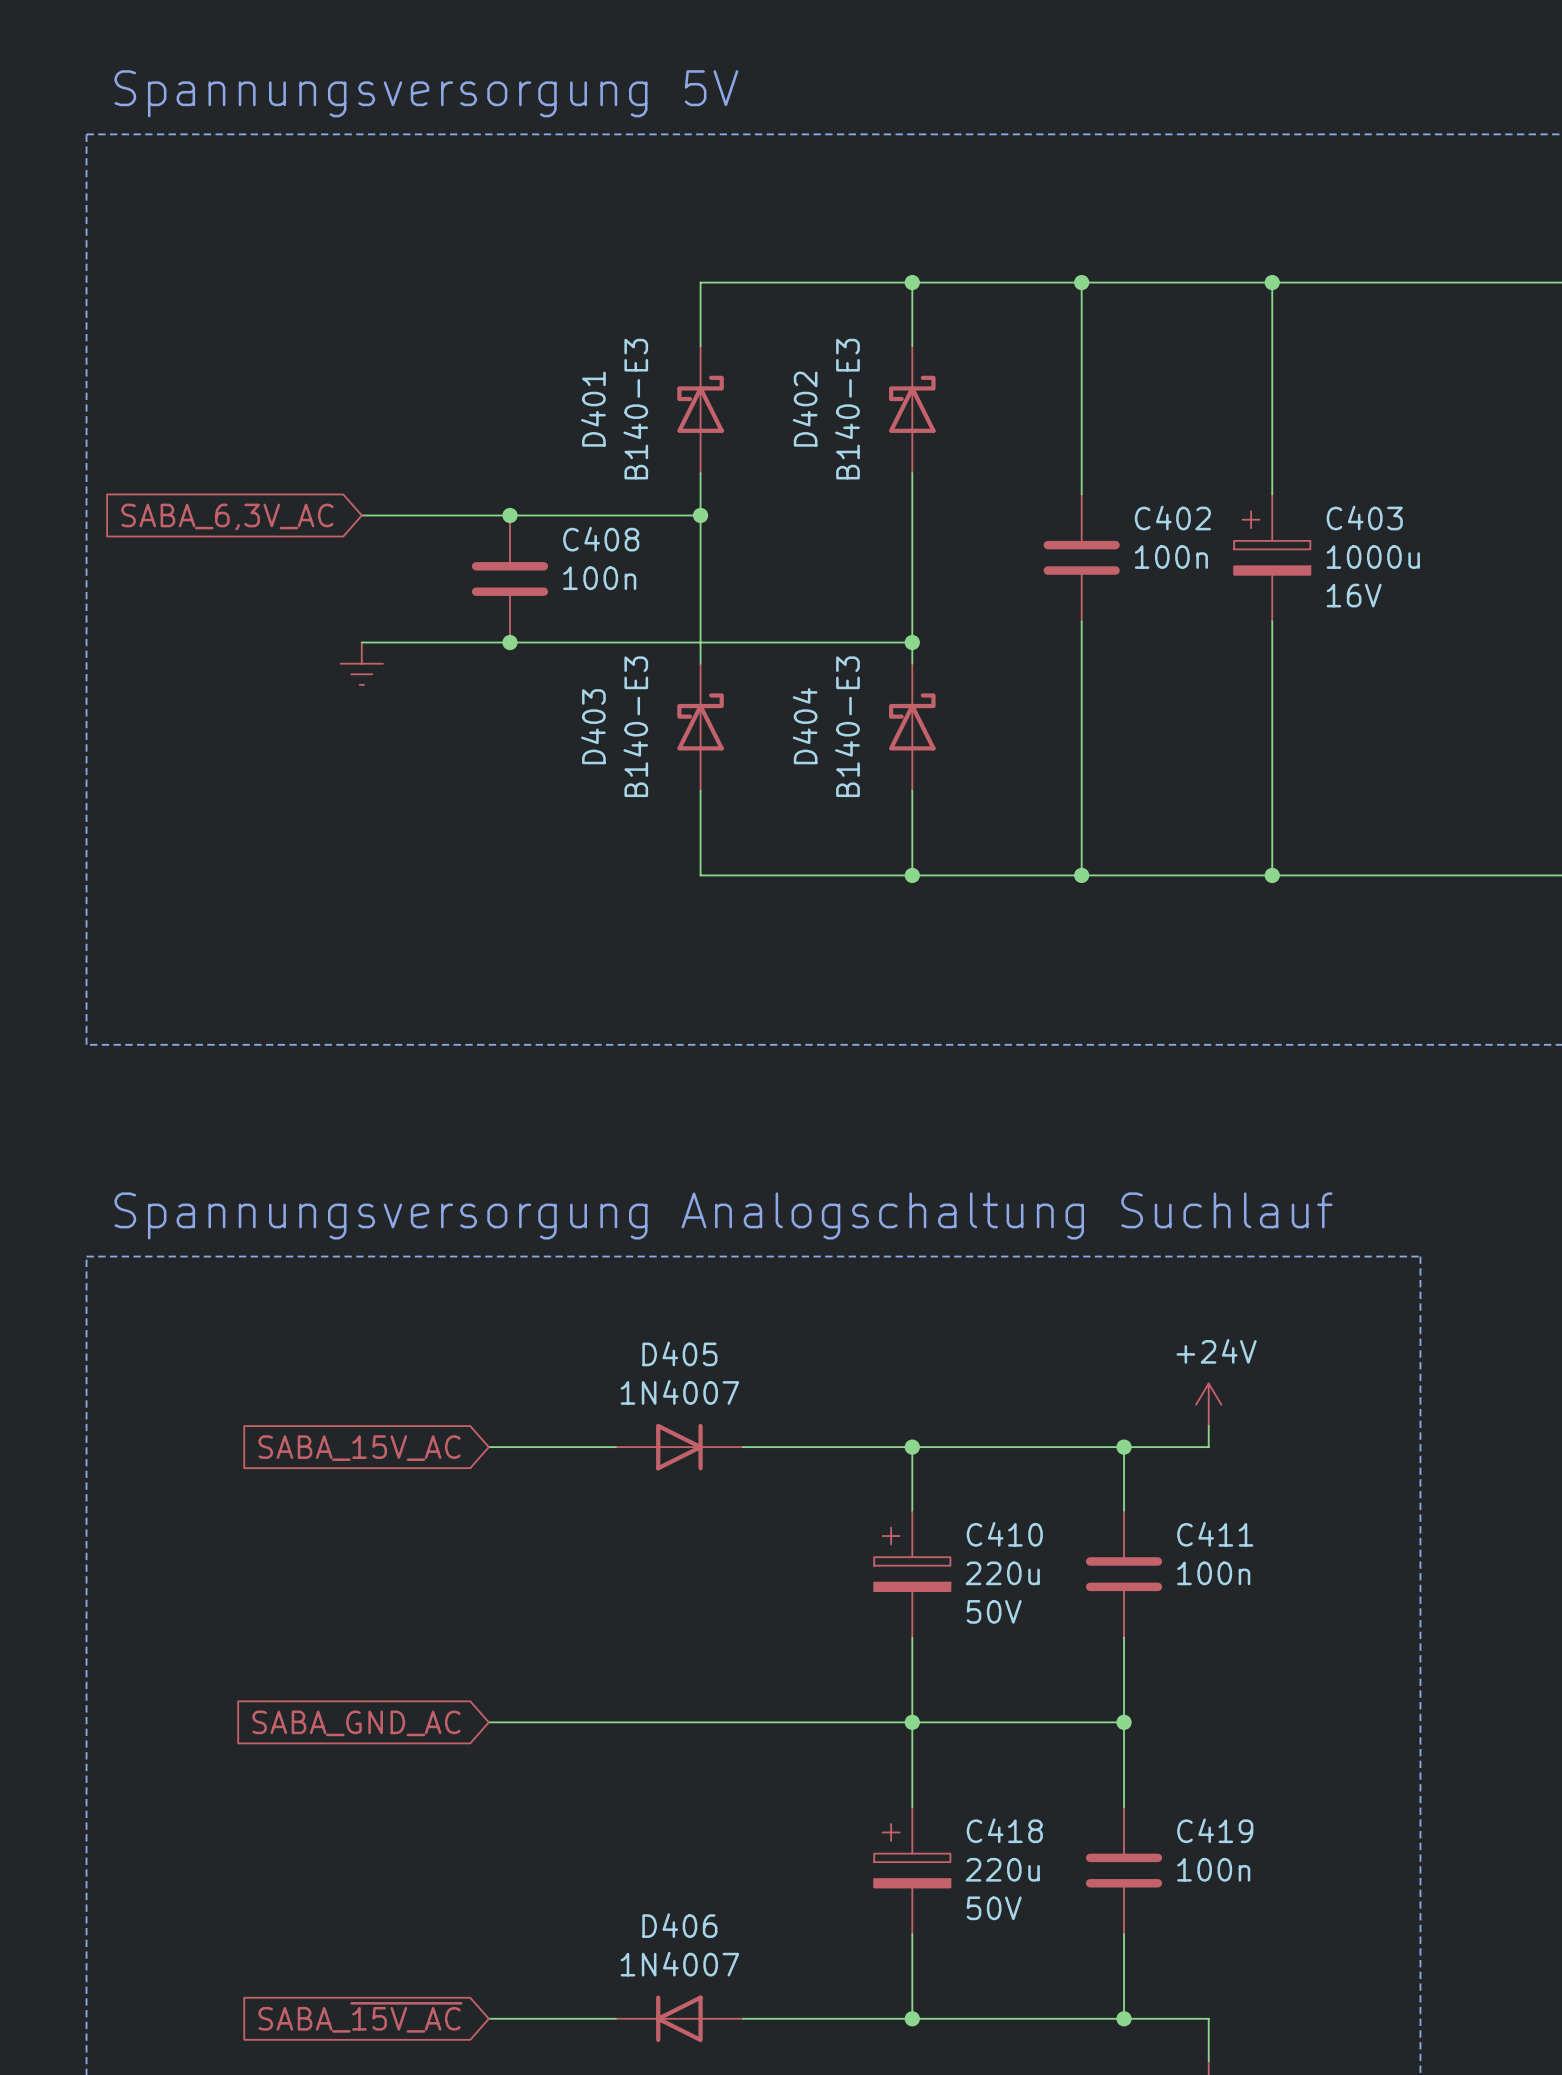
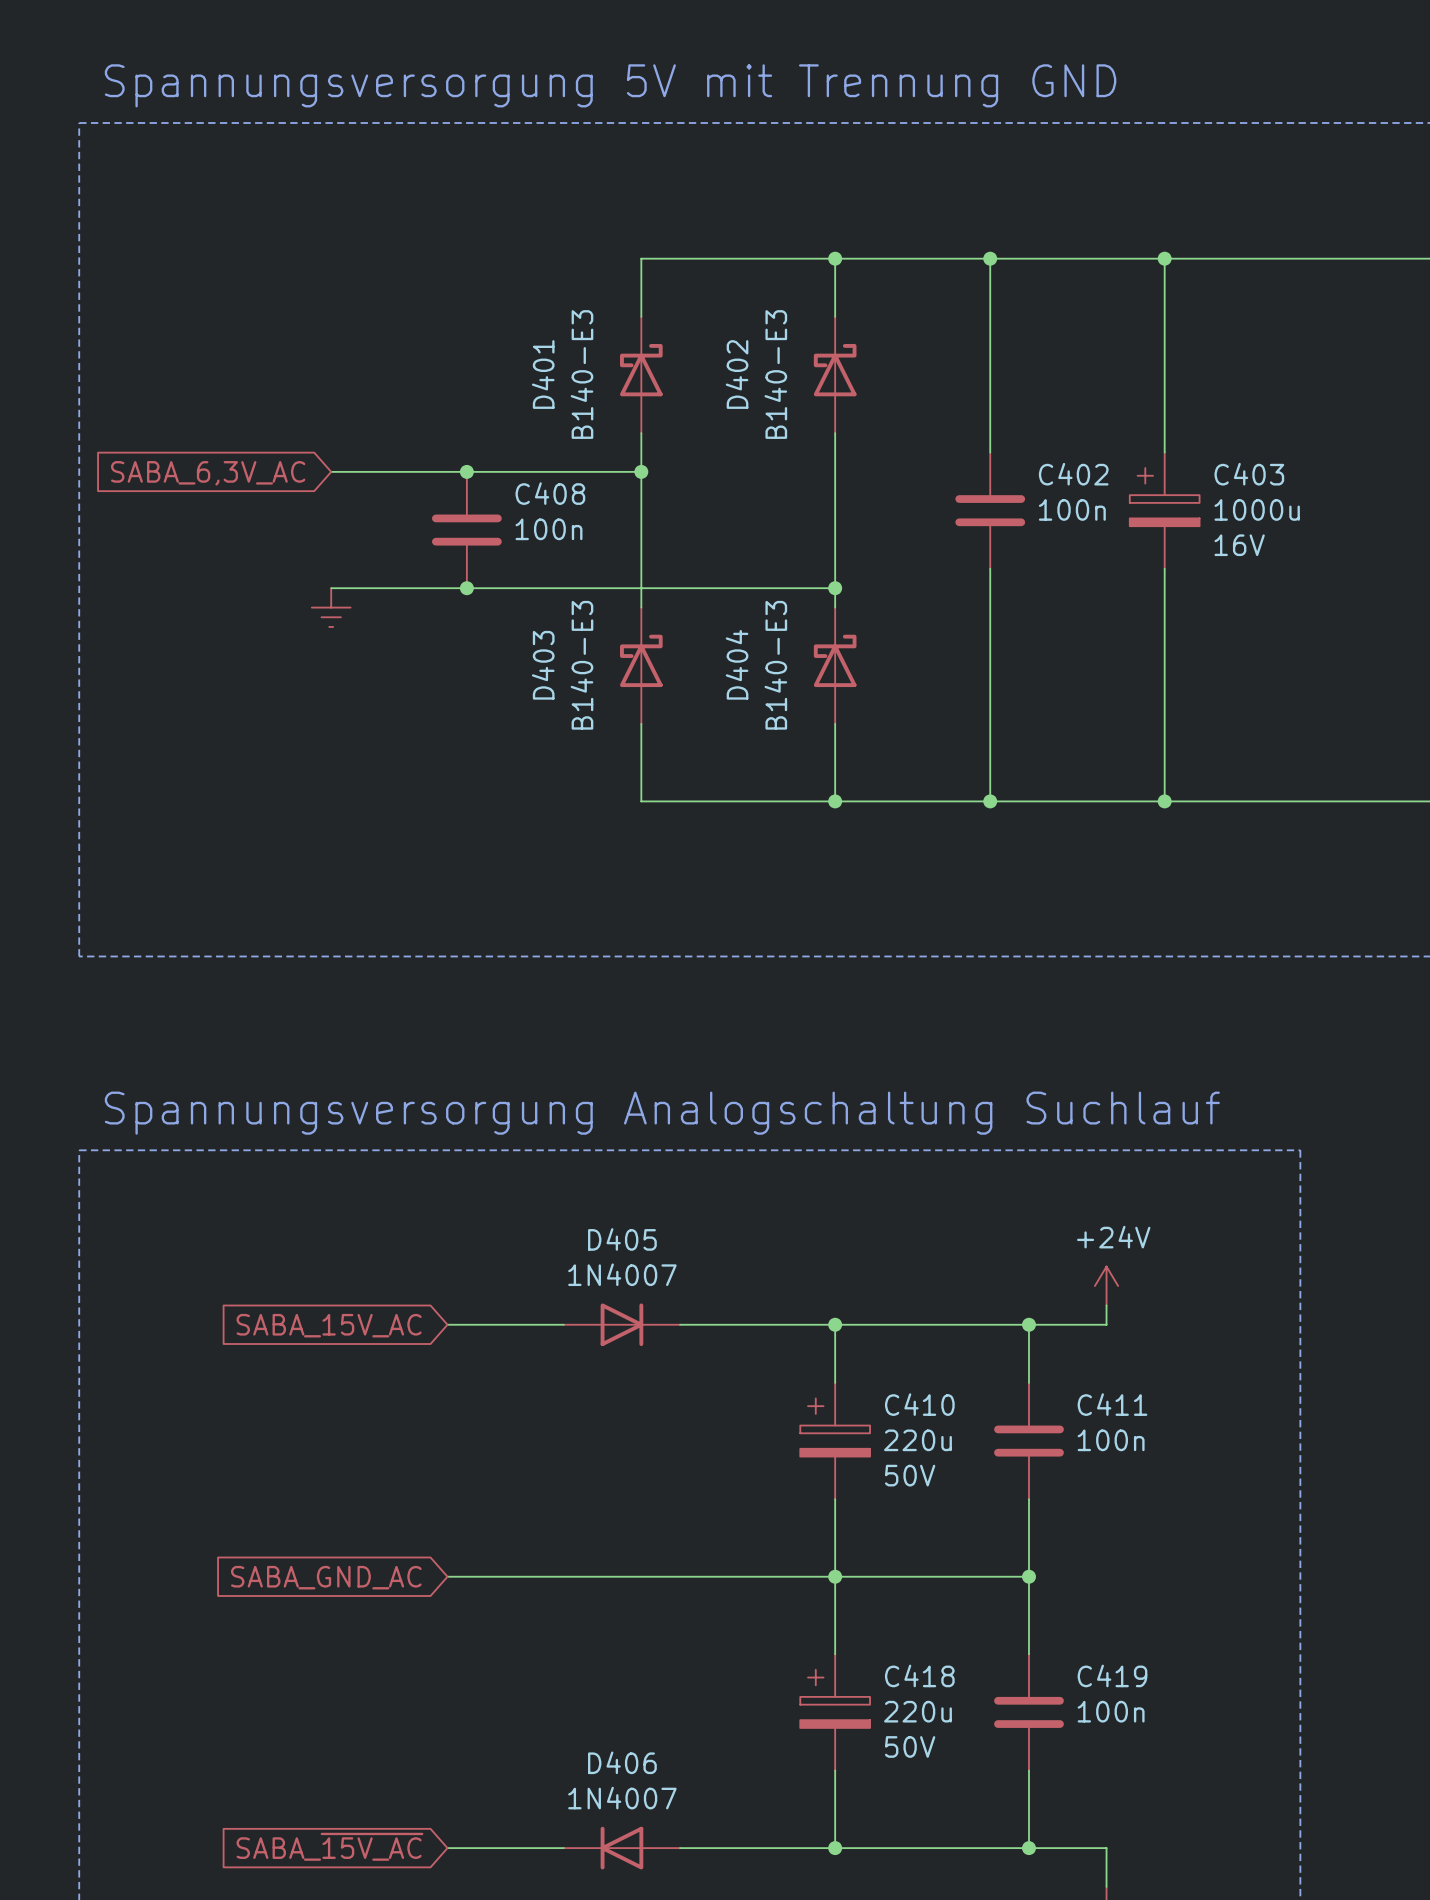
text: Spannungsversorgung 5V (426, 93) -> Spannungsversorgung 5V mit Trennung GND (610, 85)

